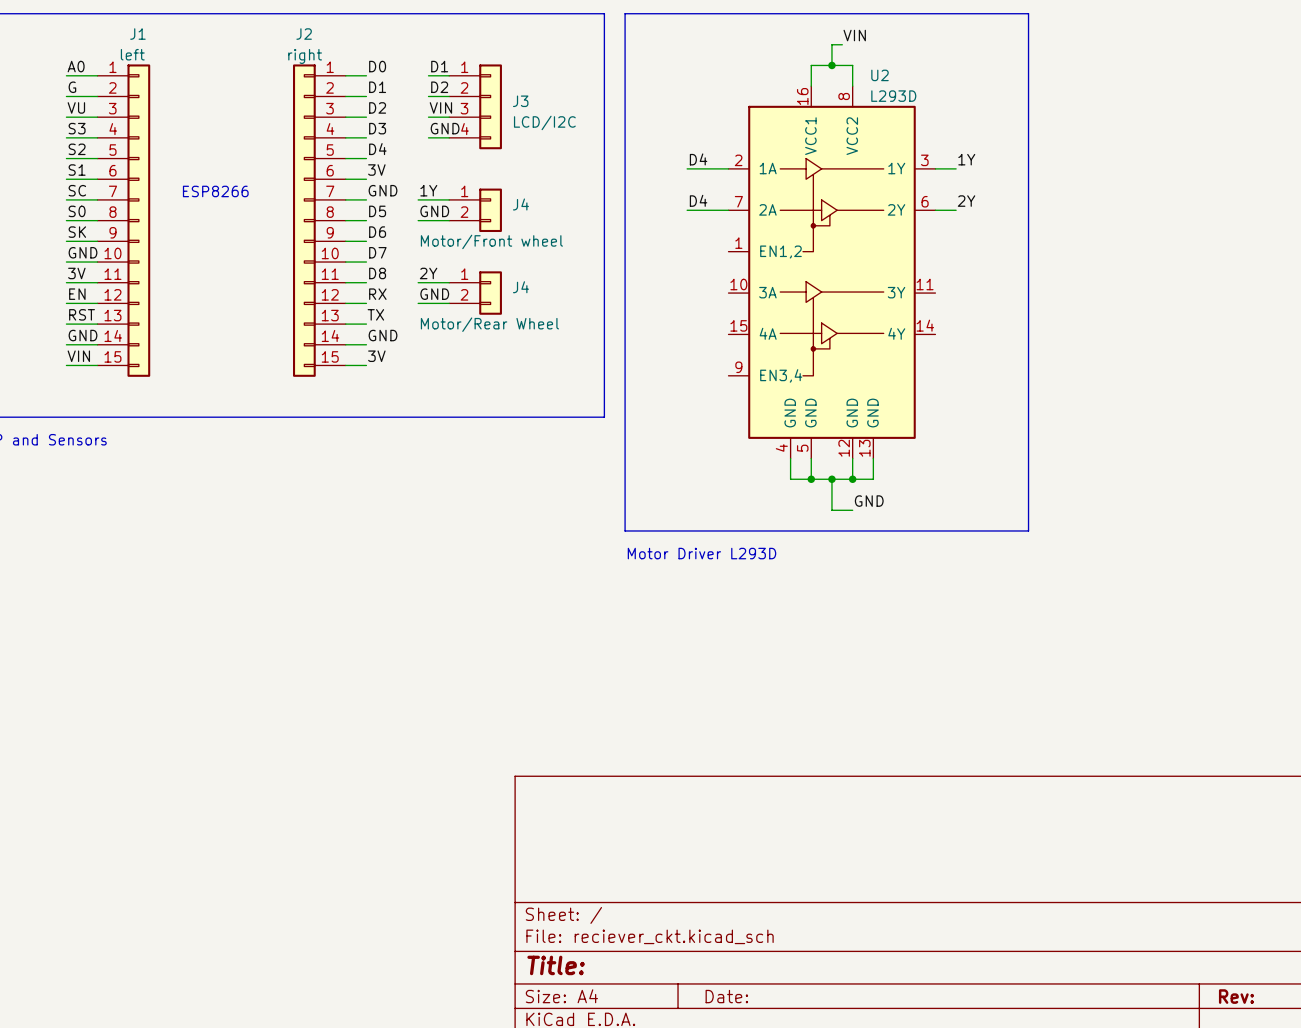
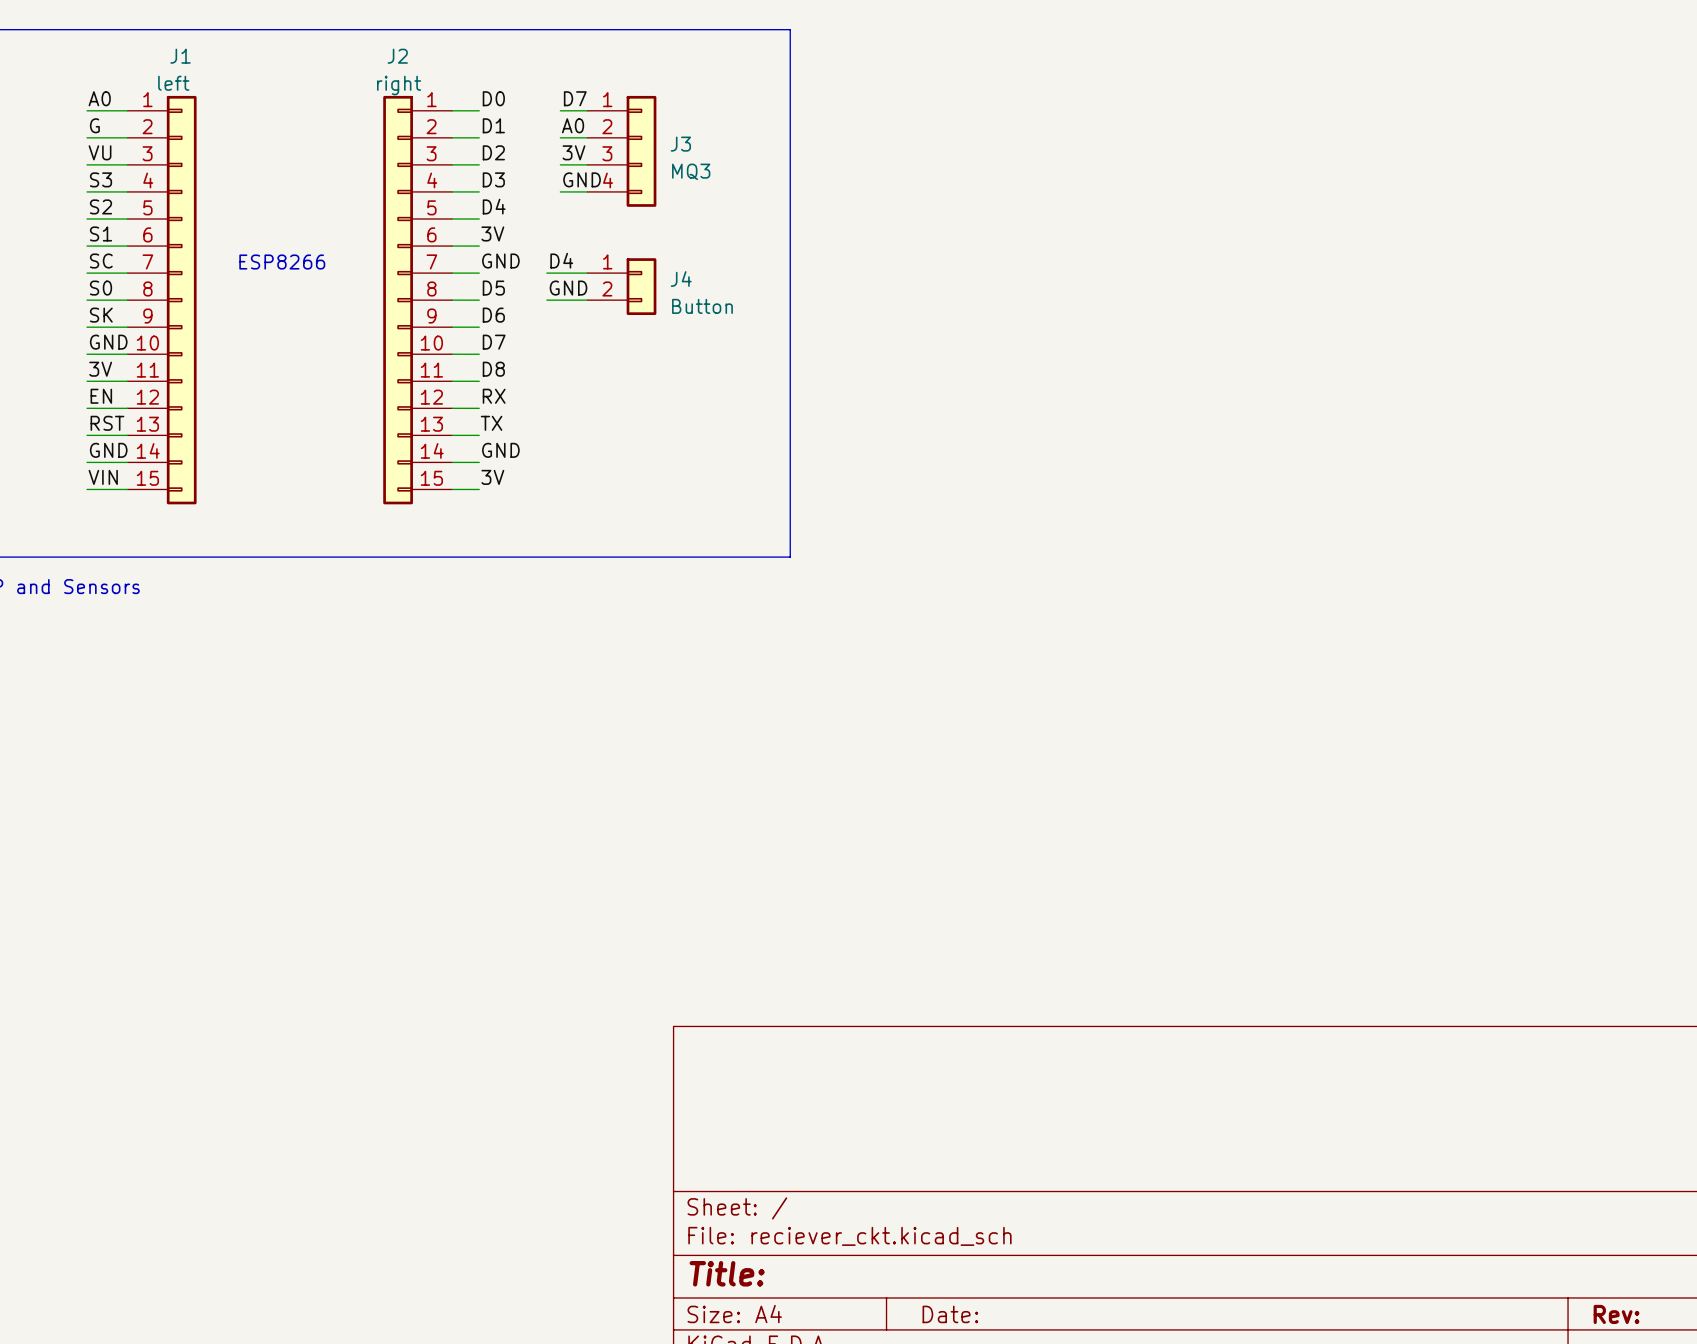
line: (625, 13) (1028, 13) (1028, 530) (625, 530) (625, 13) -> none
label: VIN (854, 35) -> none
wire: (842, 44) (831, 44) (831, 65) -> none
junction: (831, 65) -> none
label: D1 (439, 66) -> D7 (575, 98)
wire: (811, 86) (811, 65) (852, 65) (852, 86) -> none
label: D2 (439, 87) -> A0 (573, 125)
label: VIN (440, 107) -> 3V (573, 152)
J3 value: LCD/I2C (544, 122) -> MQ3 (691, 171)
label: D4 (698, 159) -> none
label: 1Y (966, 159) -> none
wire: (687, 168) (728, 168) -> none
wire: (935, 168) (956, 168) -> none
label: 1Y (428, 190) -> D4 (561, 260)
label: D4 (698, 200) -> none
label: 2Y (966, 201) -> none
wire: (687, 210) (728, 210) -> none
wire: (935, 210) (956, 210) -> none
J4 value: Motor/Front wheel (491, 241) -> Button (702, 306)
U2: L293D (831, 272) -> none
label: 2Y (428, 273) -> none
wire: (418, 282) (449, 282) -> none
J4: Motor/Rear Wheel (475, 293) -> none
label: GND (434, 294) -> none
wire: (418, 303) (449, 303) -> none
wire: (790, 458) (790, 479) (873, 479) (873, 458) -> none
wire: (811, 458) (811, 479) -> none
wire: (852, 458) (852, 479) -> none
junction: (811, 479) -> none
wire: (831, 479) (831, 510) (852, 510) -> none
junction: (831, 479) -> none
junction: (852, 479) -> none
label: GND (869, 501) -> none
text: Motor Driver L293D (702, 553) -> none

